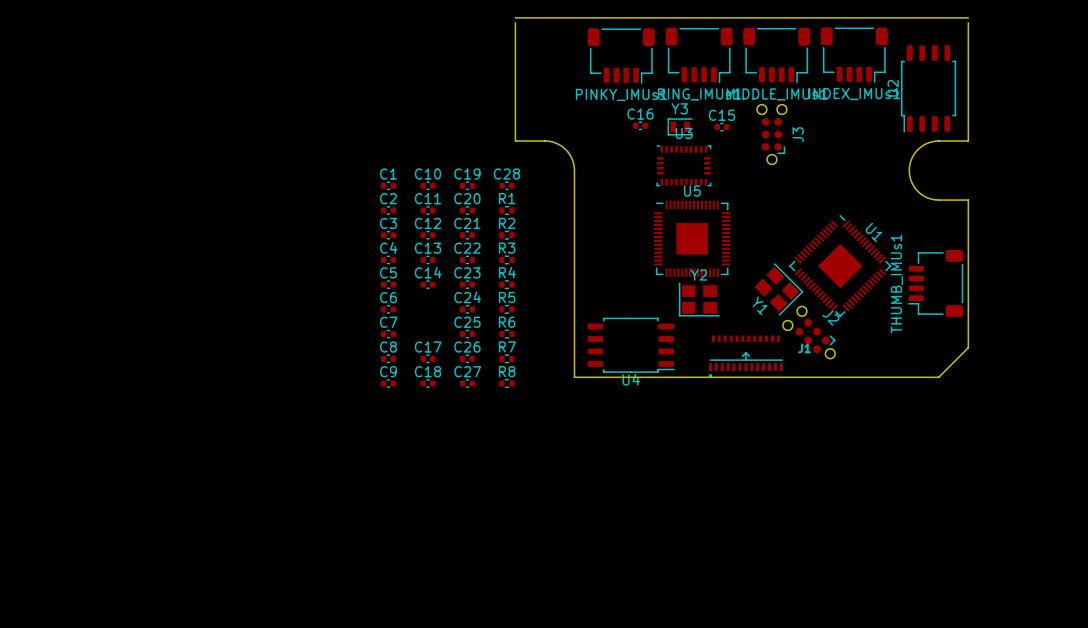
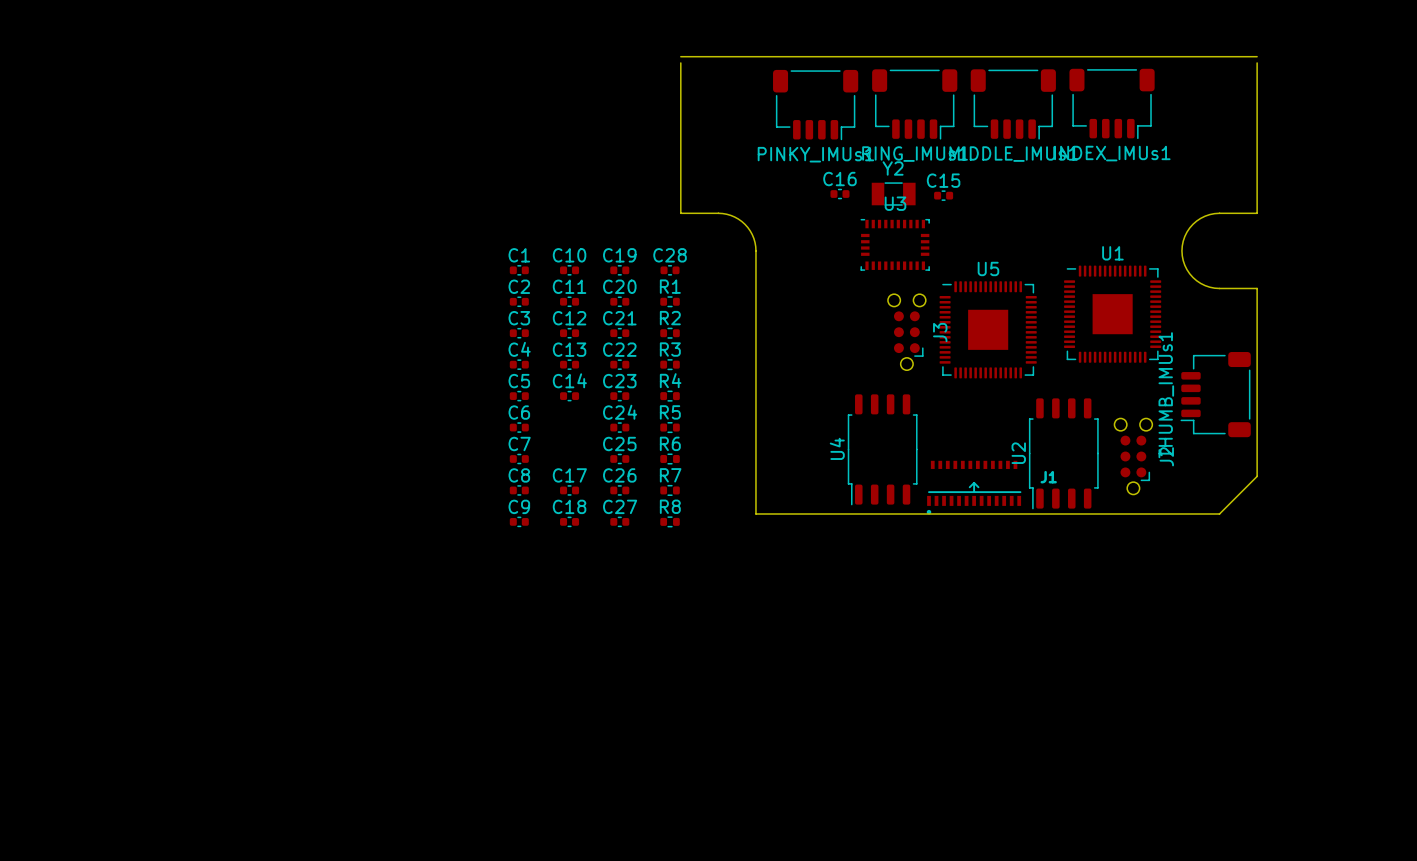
U2 position: (928, 88) -> (1063, 453)
Y3: (680, 126) -> none
J3 position: (771, 134) -> (906, 332)
U5 position: (692, 238) -> (988, 329)
U1 rotation: 0° (840, 266) -> 45° counterclockwise (1112, 314)
Y2 footprint: [679, 282, 720, 317] -> [871, 182, 916, 206]
Y1: (778, 289) -> none
J2 rotation: 0° (809, 332) -> 45° clockwise (1133, 456)
J2 position: (809, 332) -> (1133, 456)
U4 rotation: 0° (631, 345) -> 90° clockwise (882, 449)

